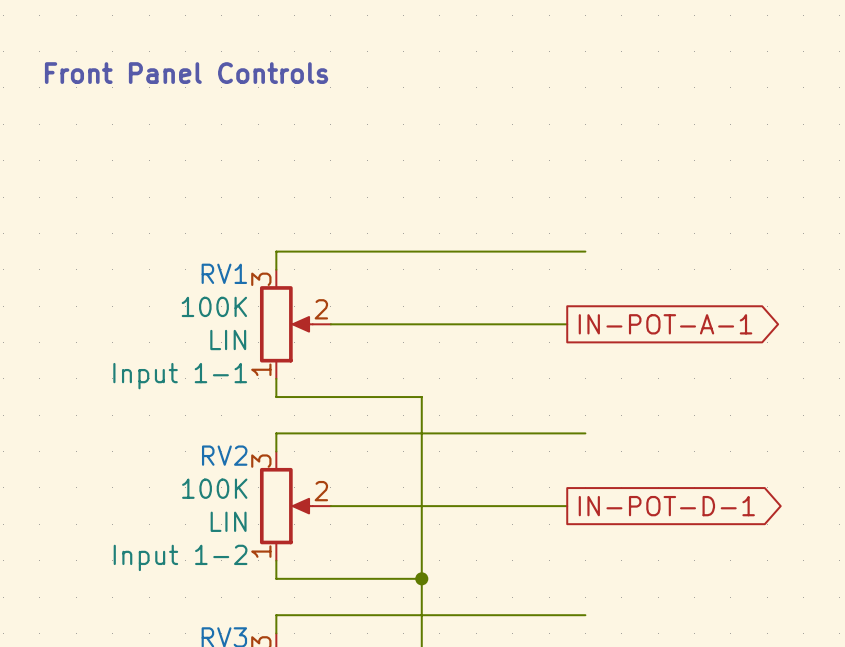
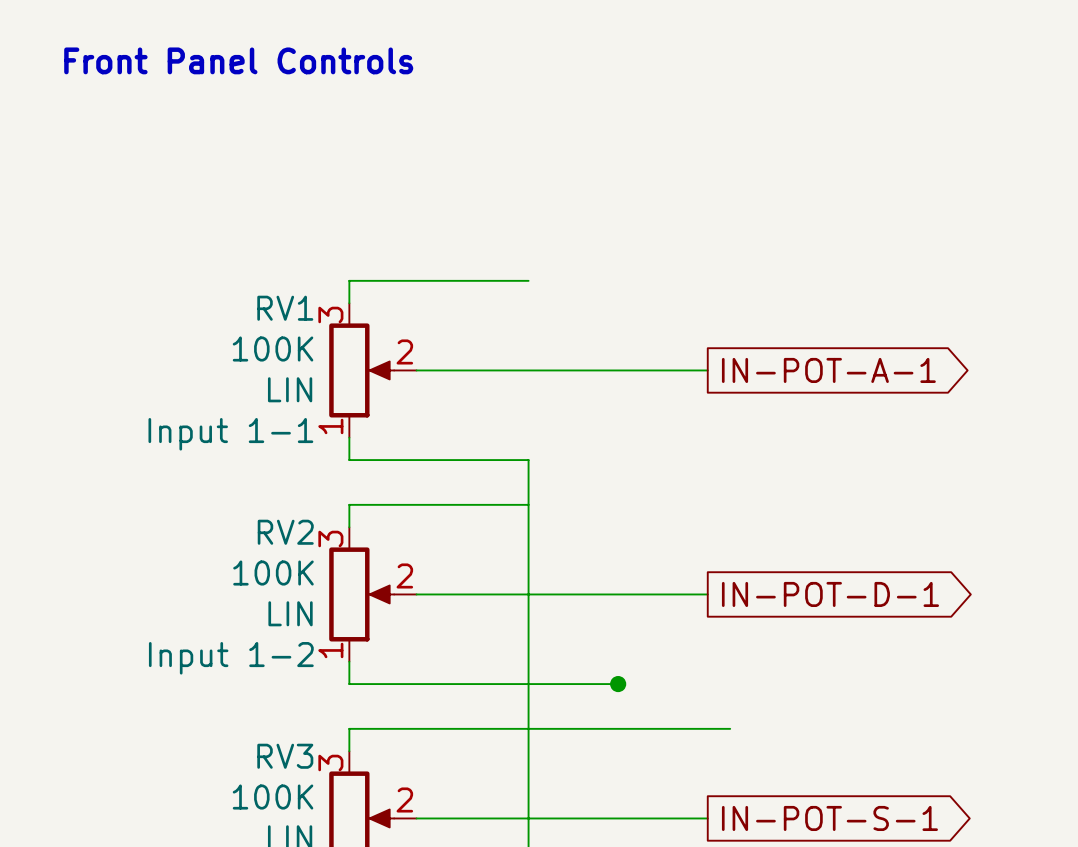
wire: (421, 251) (585, 251) -> none
wire: (421, 433) (585, 433) -> none
wire: none -> (528, 684) (618, 684)
junction position: (421, 578) -> (618, 684)

